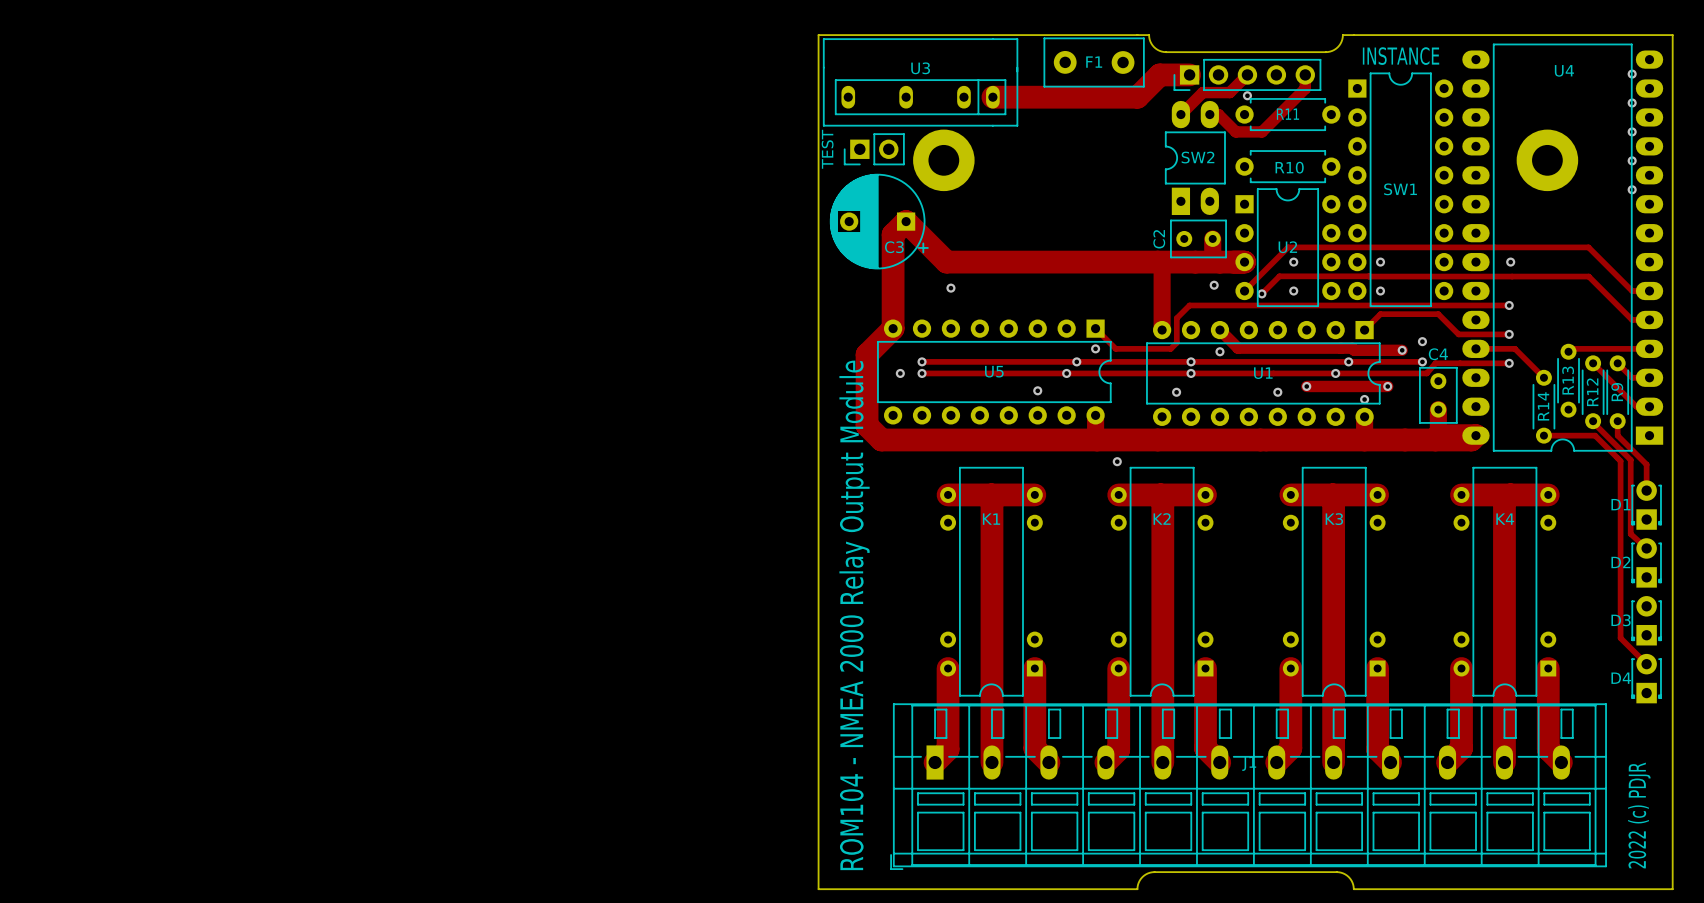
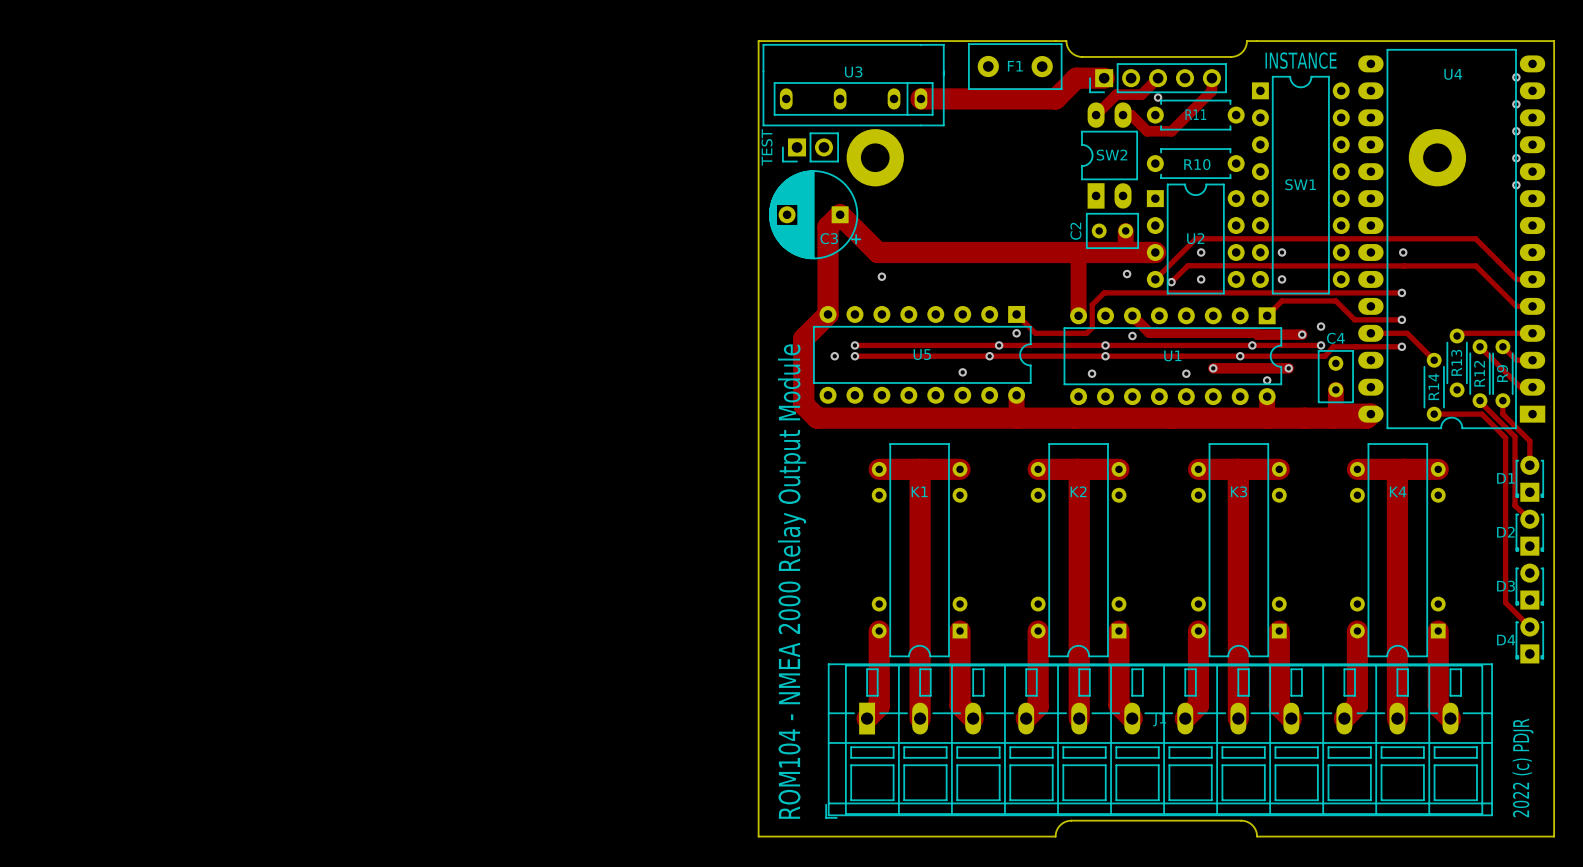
via: (1117, 461) -> none

